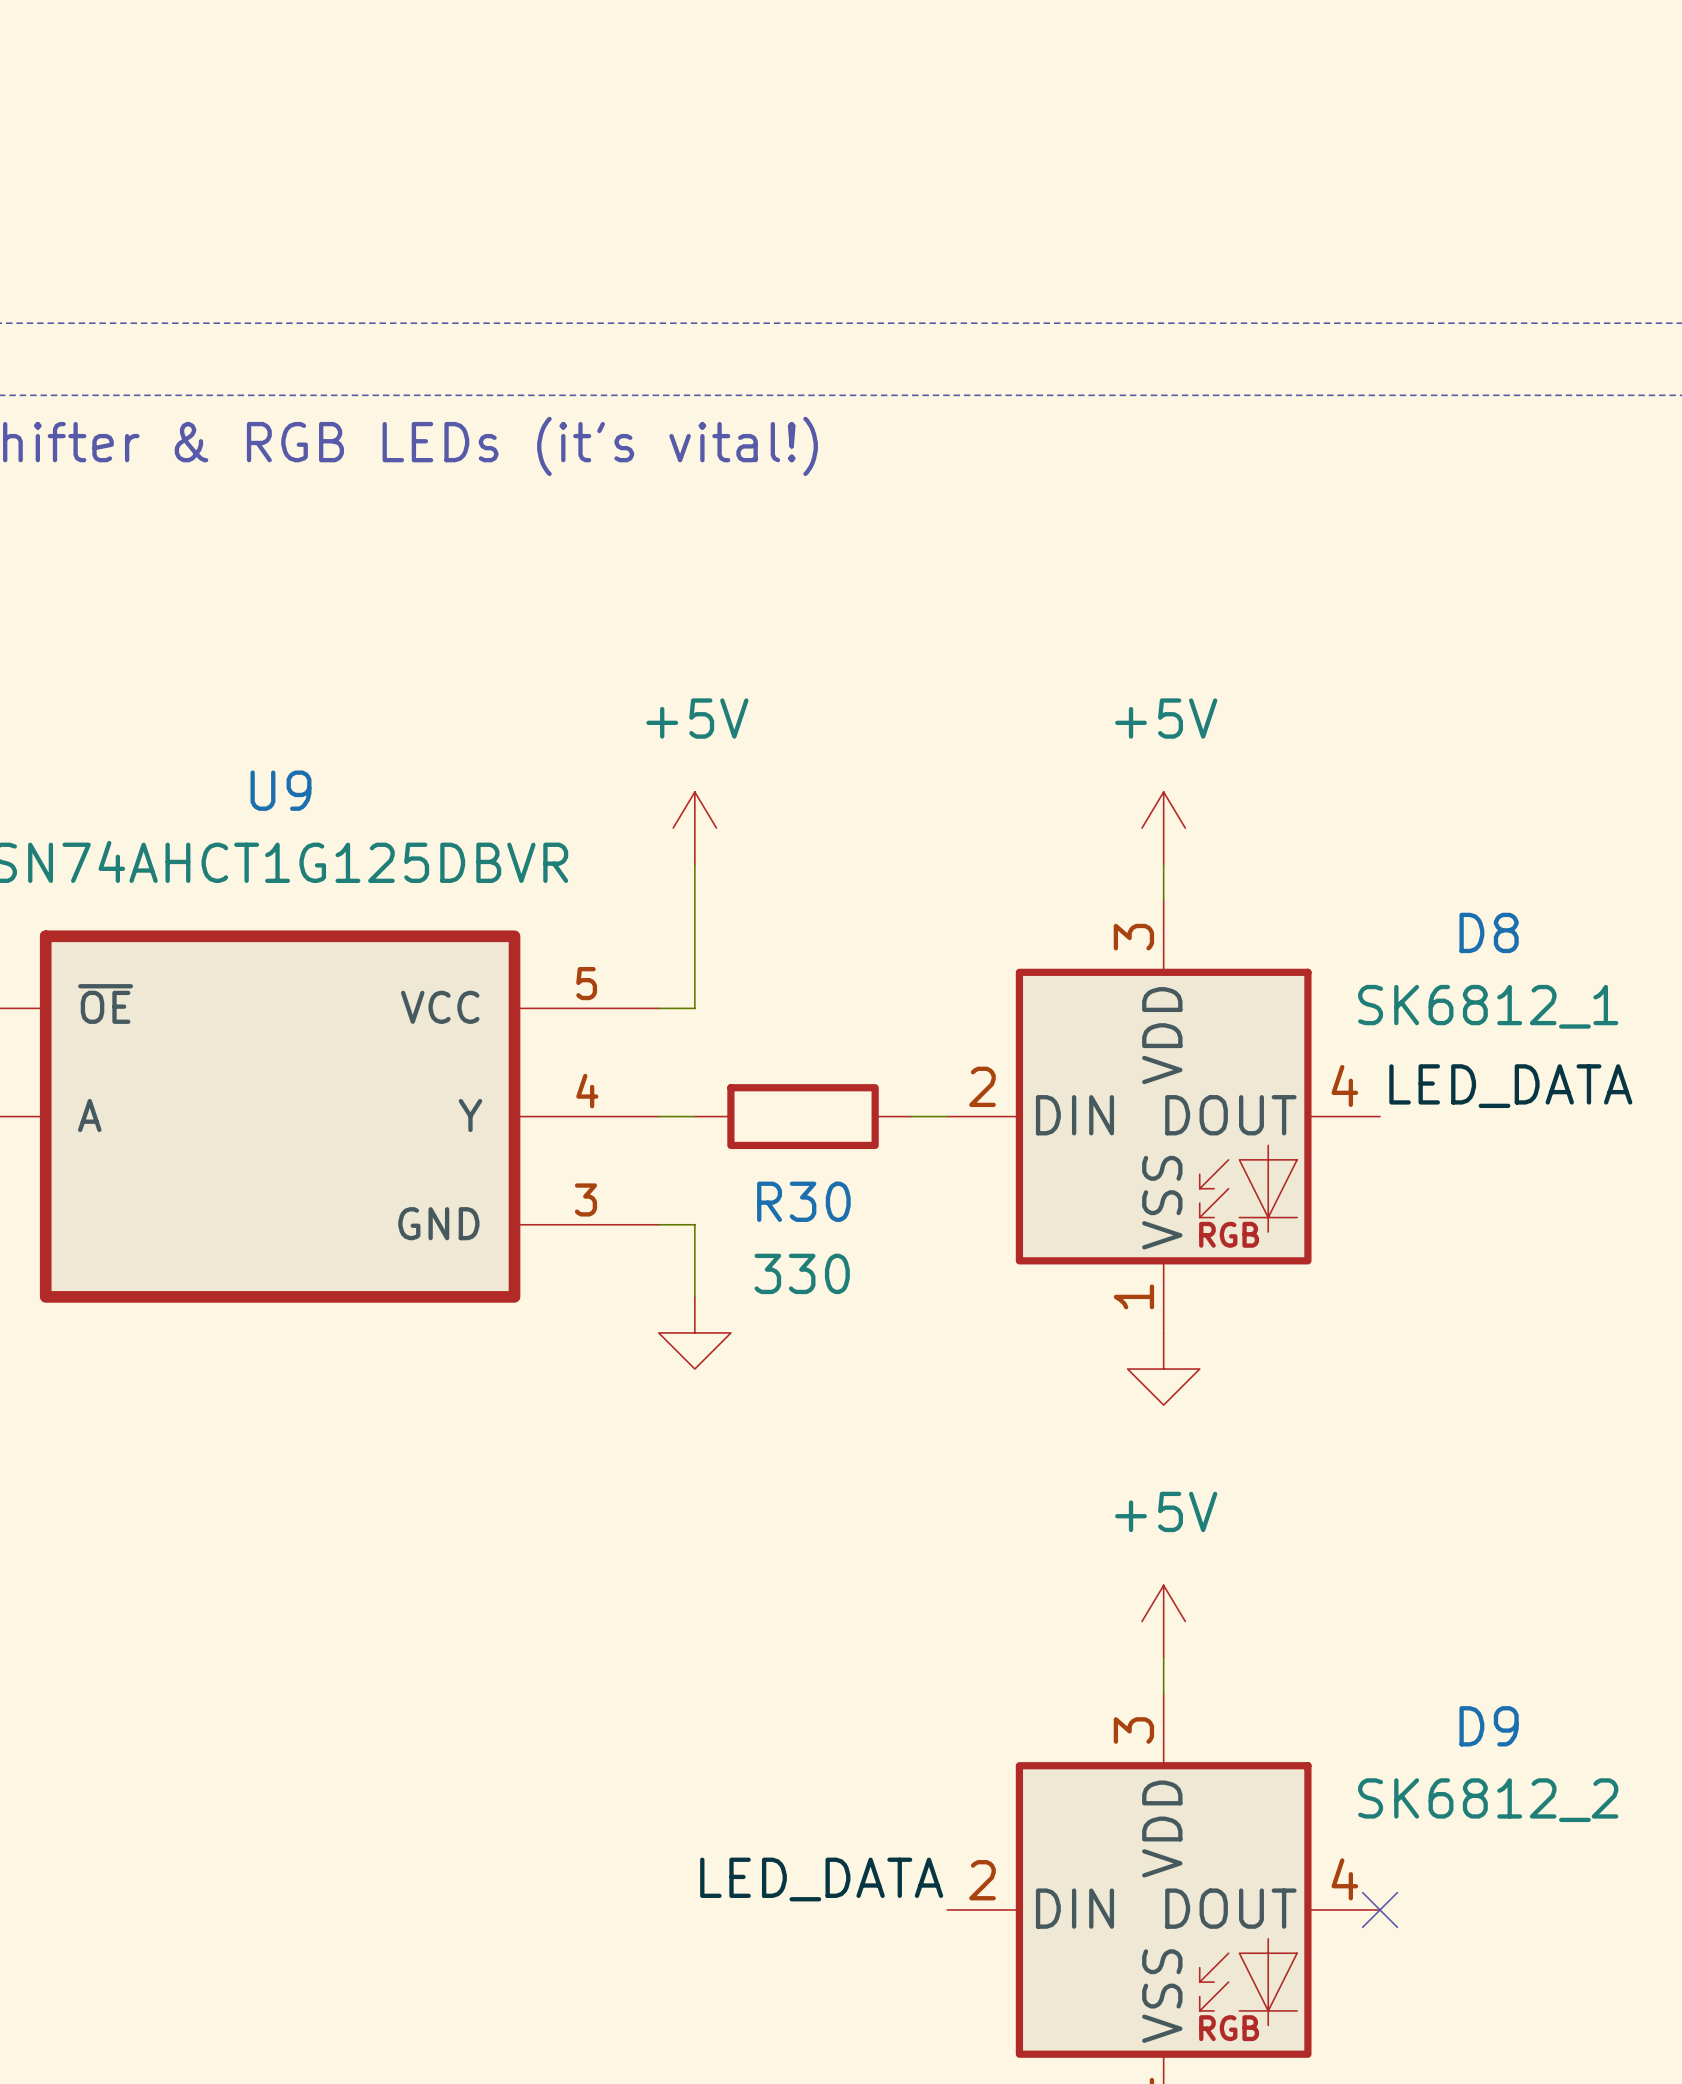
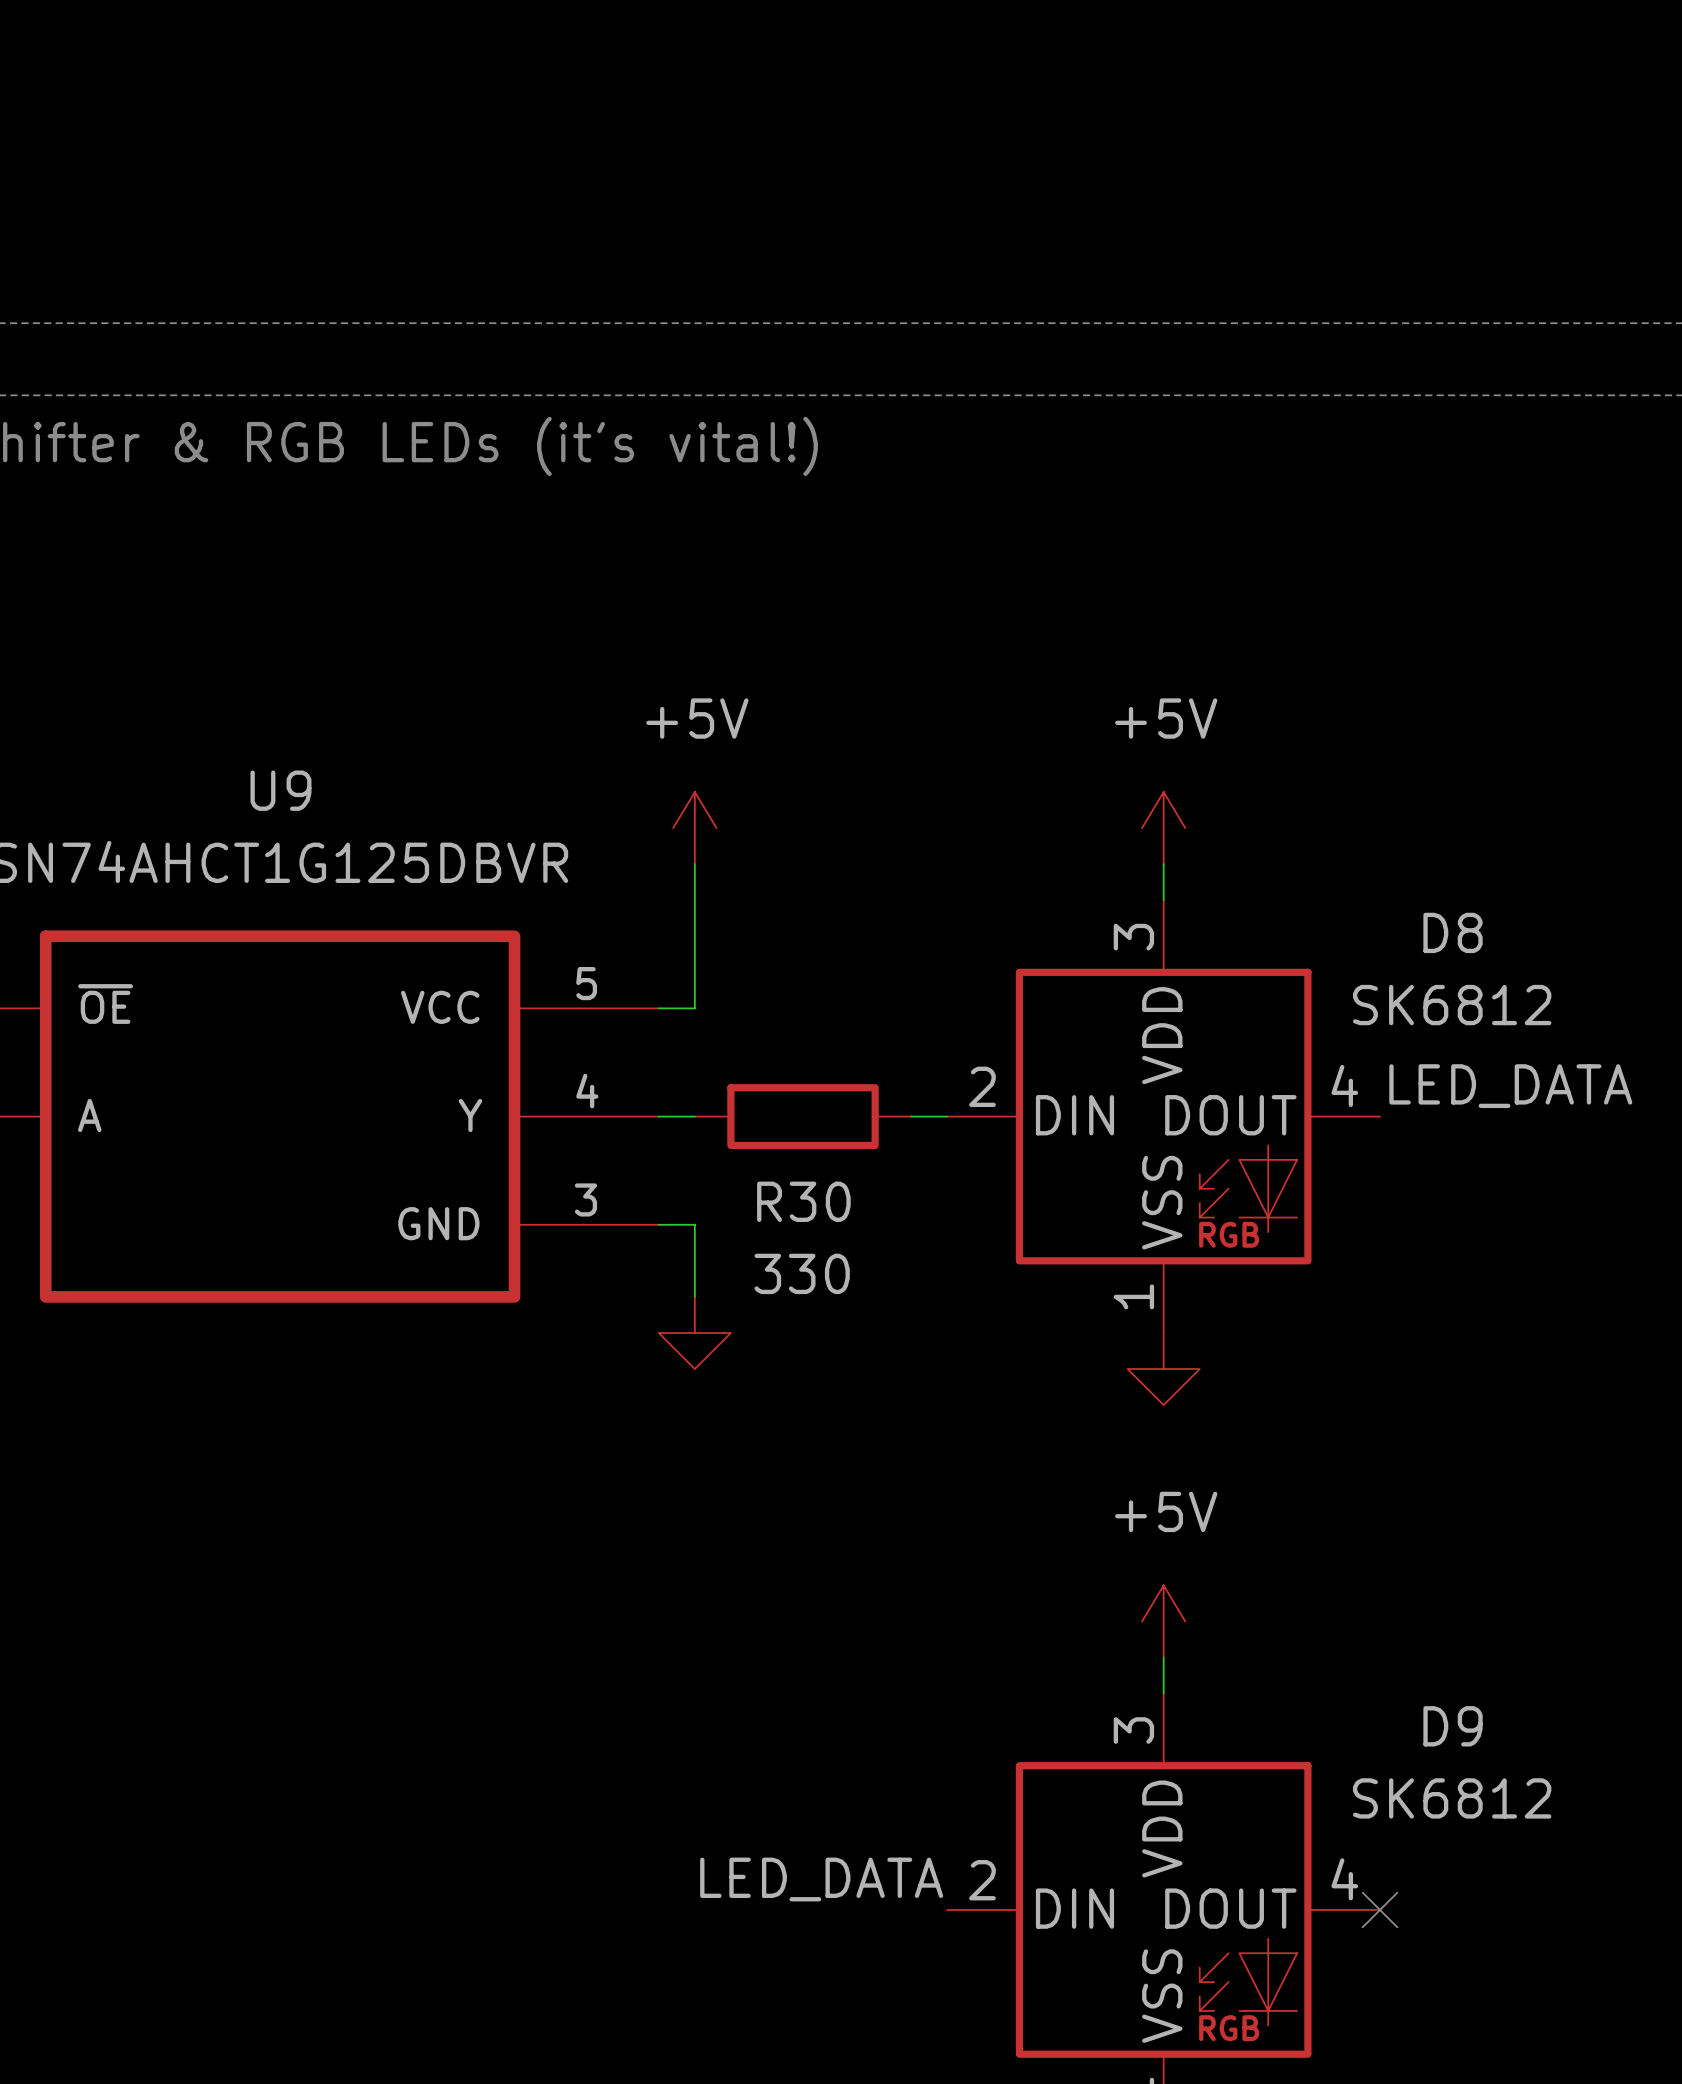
D8 name position: D8 (1489, 932) -> D8 (1453, 932)
D8 value: SK6812_1 (1488, 1006) -> SK6812 (1452, 1005)
D9 name position: D9 (1489, 1726) -> D9 (1453, 1726)
D9 value: SK6812_2 (1488, 1800) -> SK6812 (1452, 1798)

